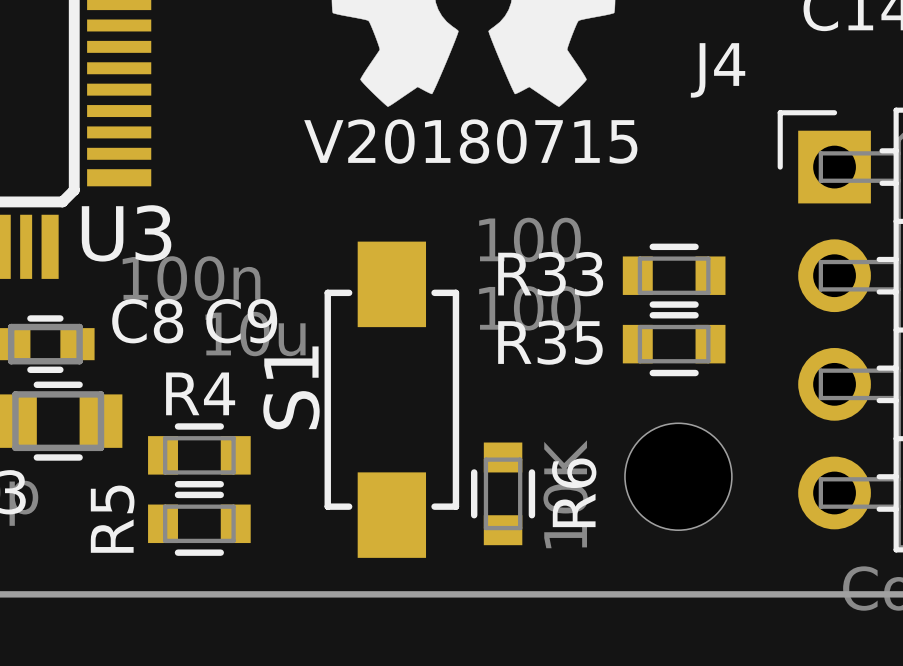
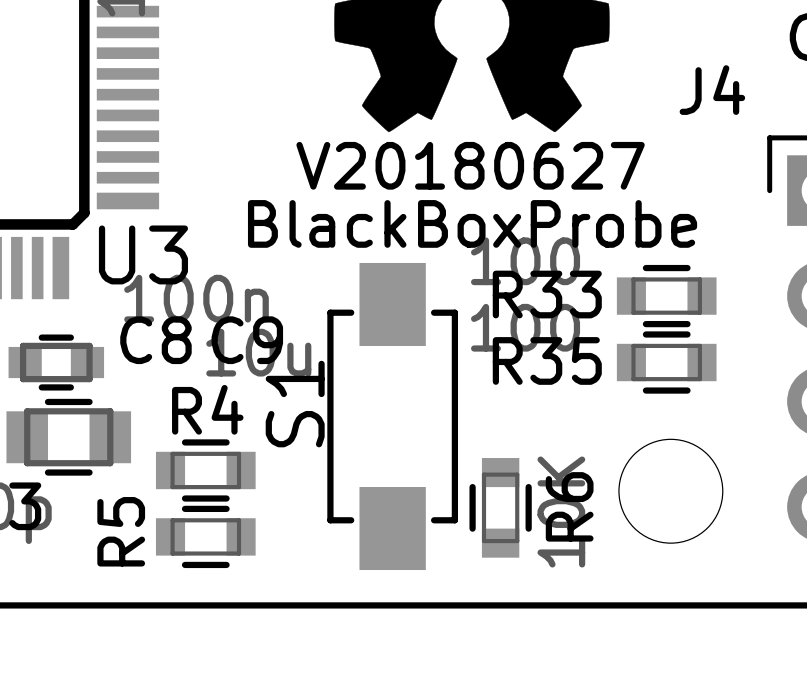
drawing shape: [304, 119, 638, 164] -> [296, 141, 645, 190]
drawing: none -> [247, 200, 698, 248]

